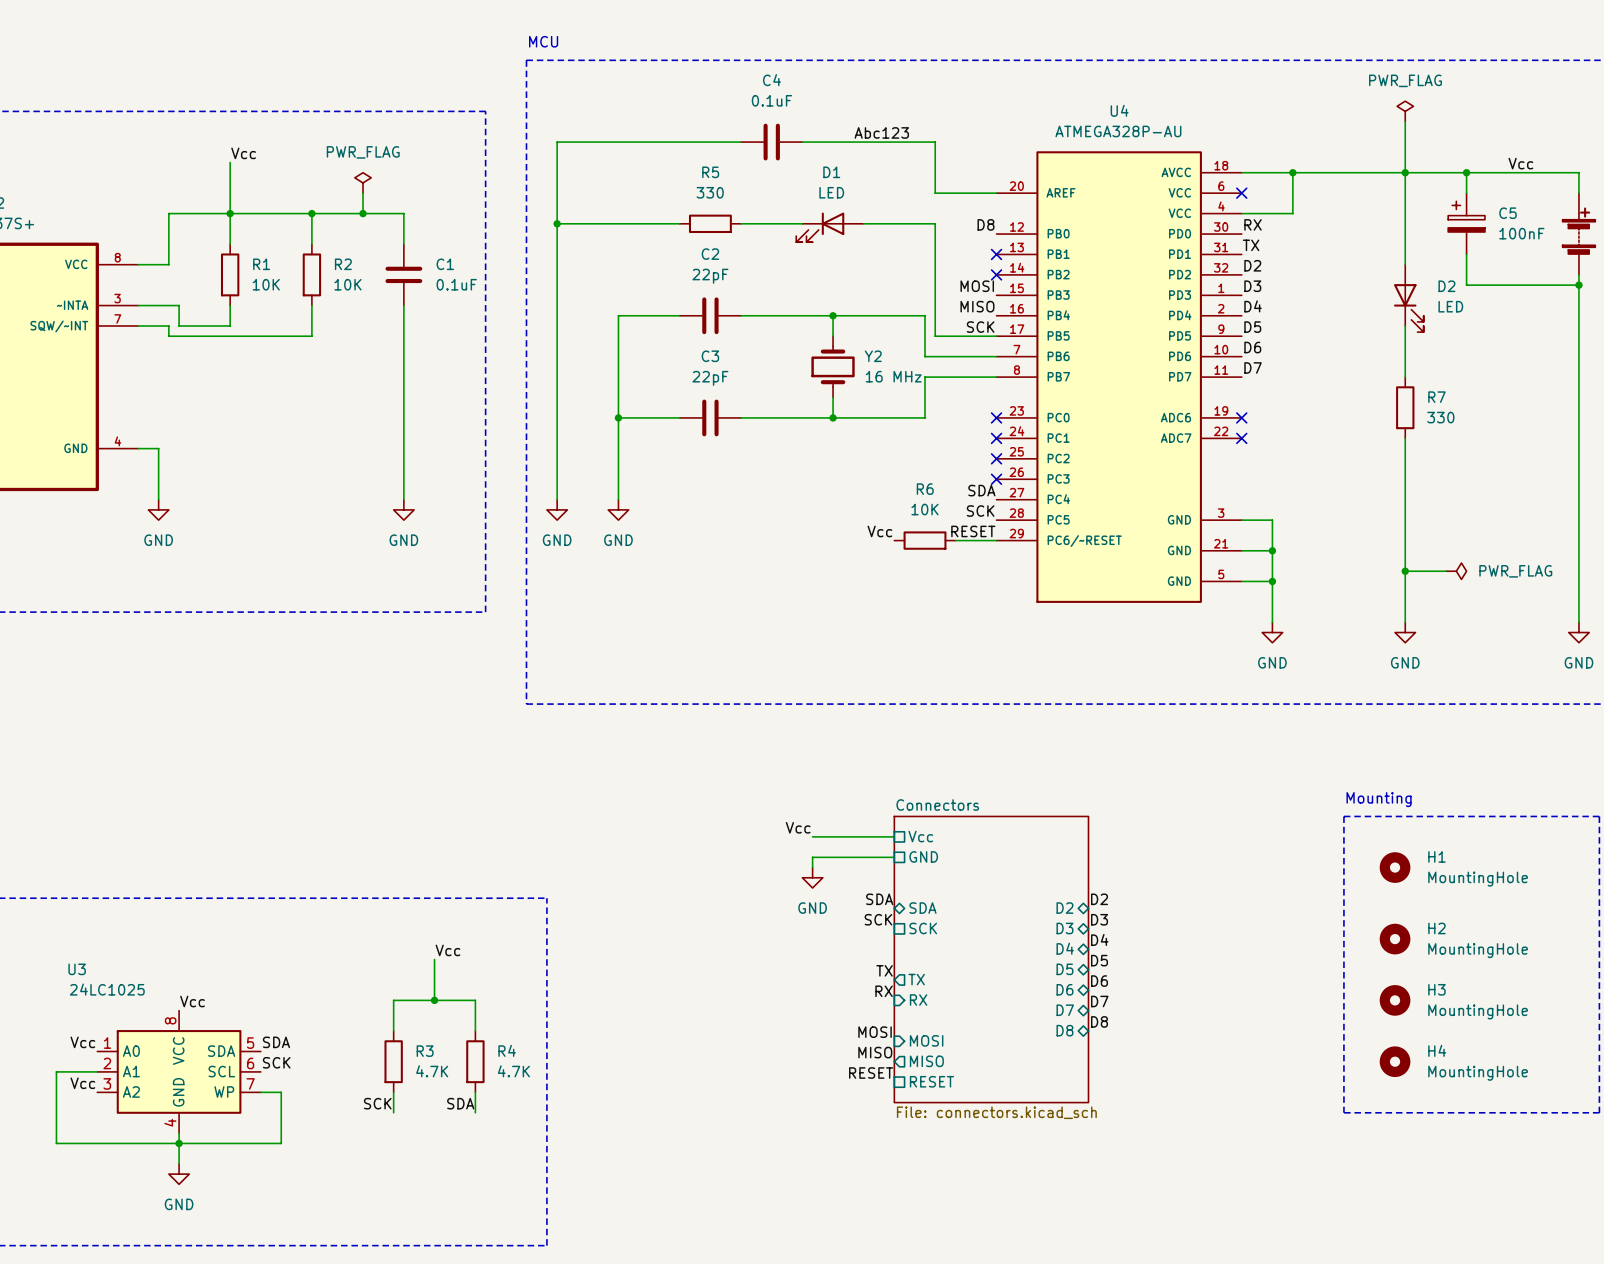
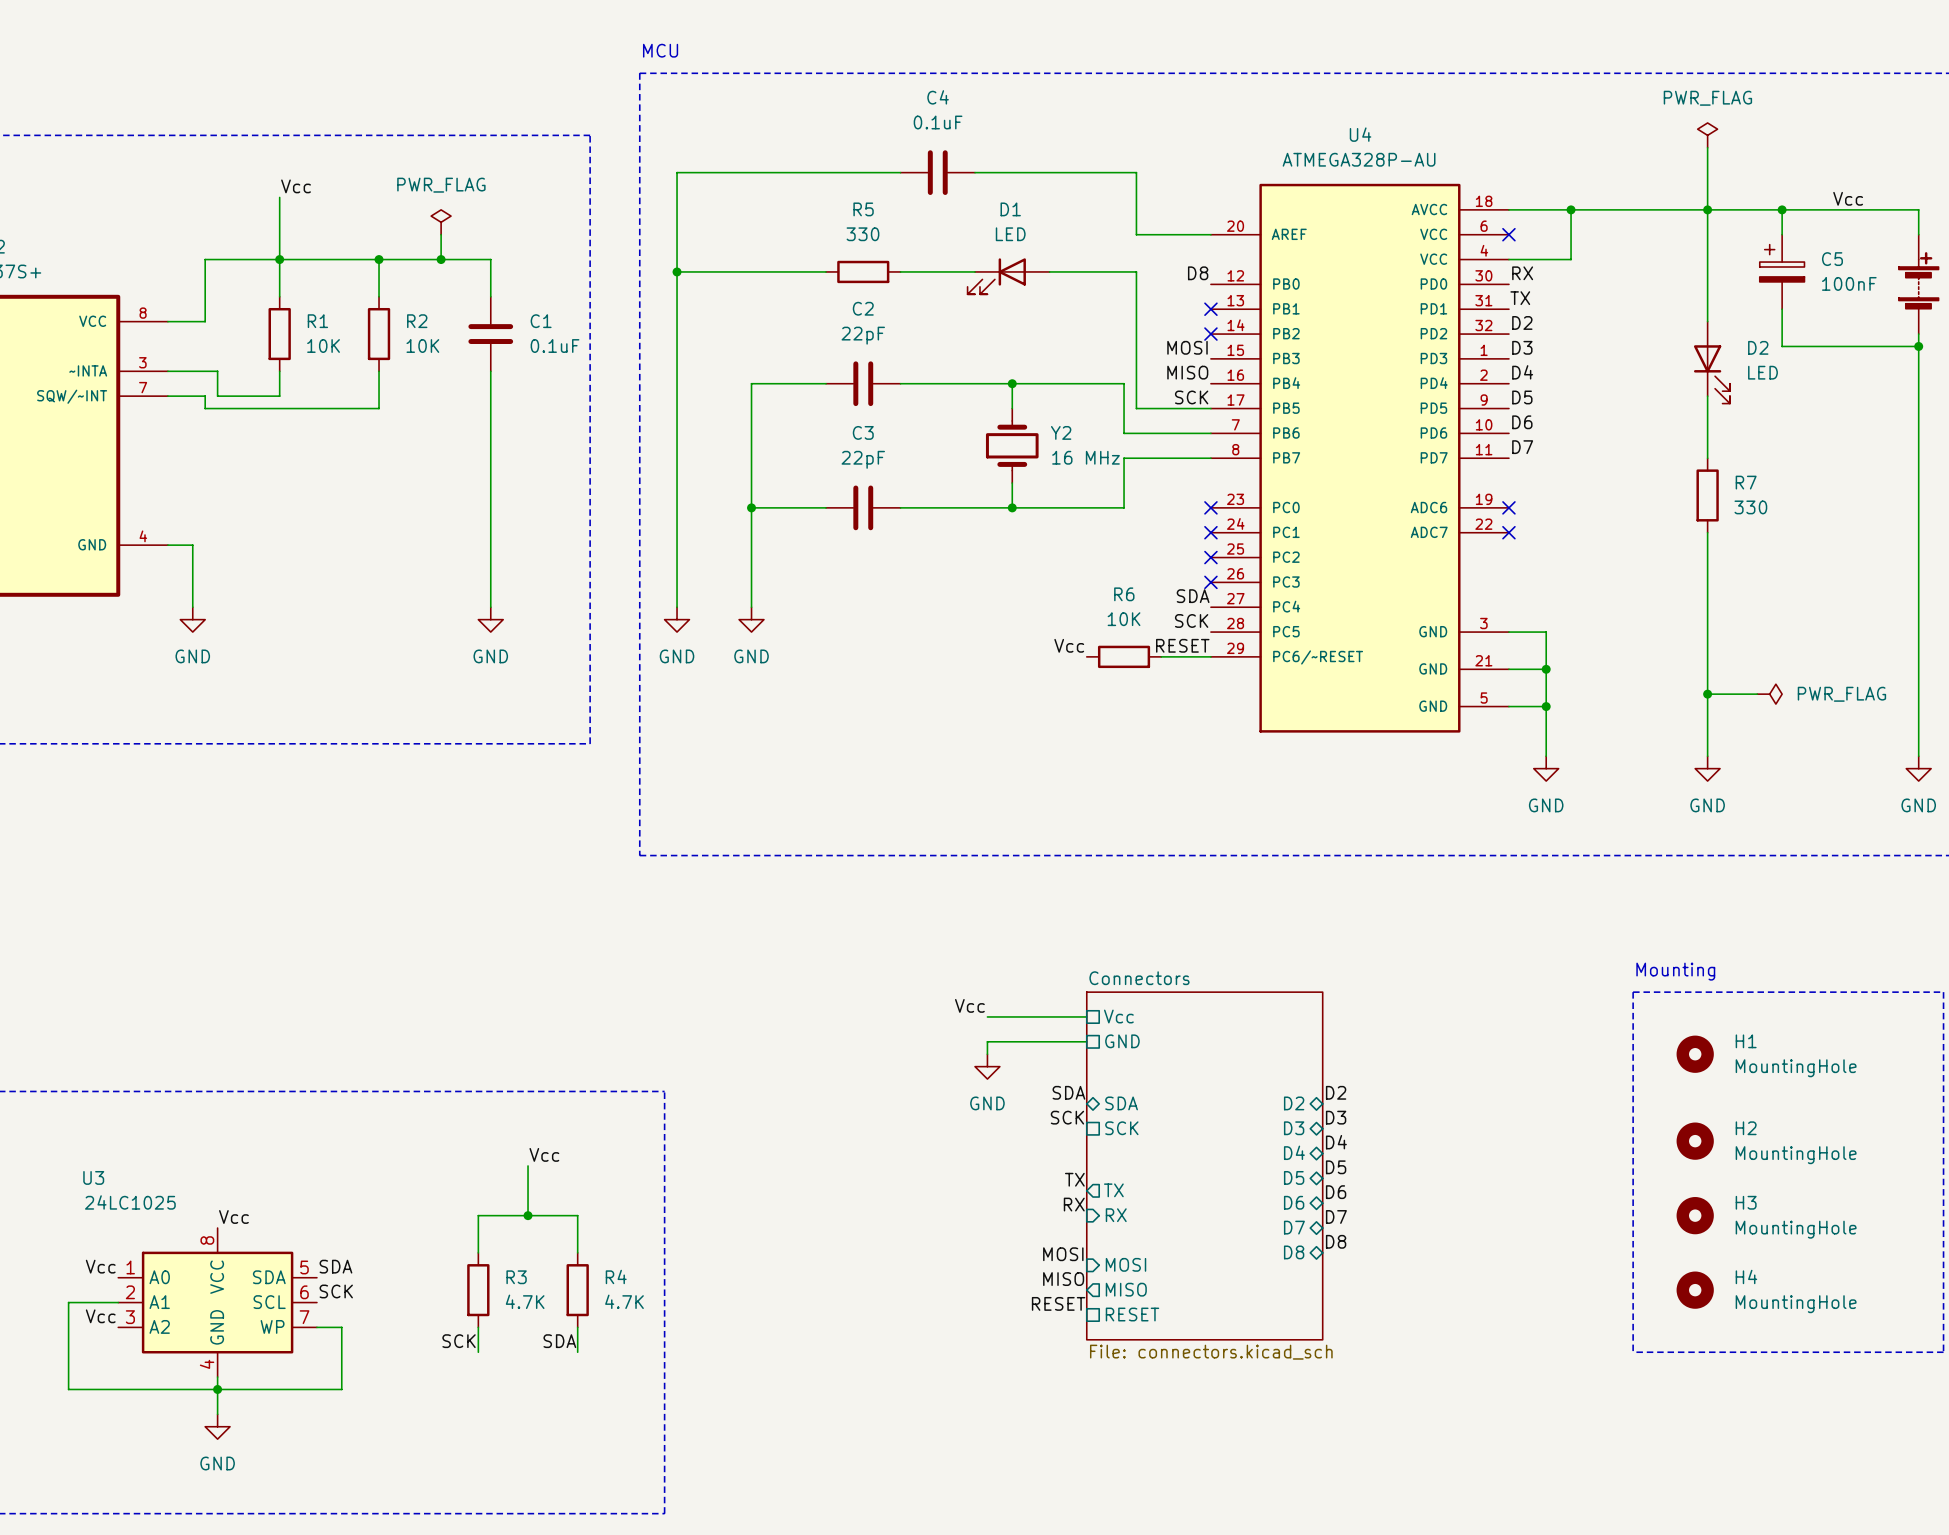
label: Abc123 (881, 132) -> none

